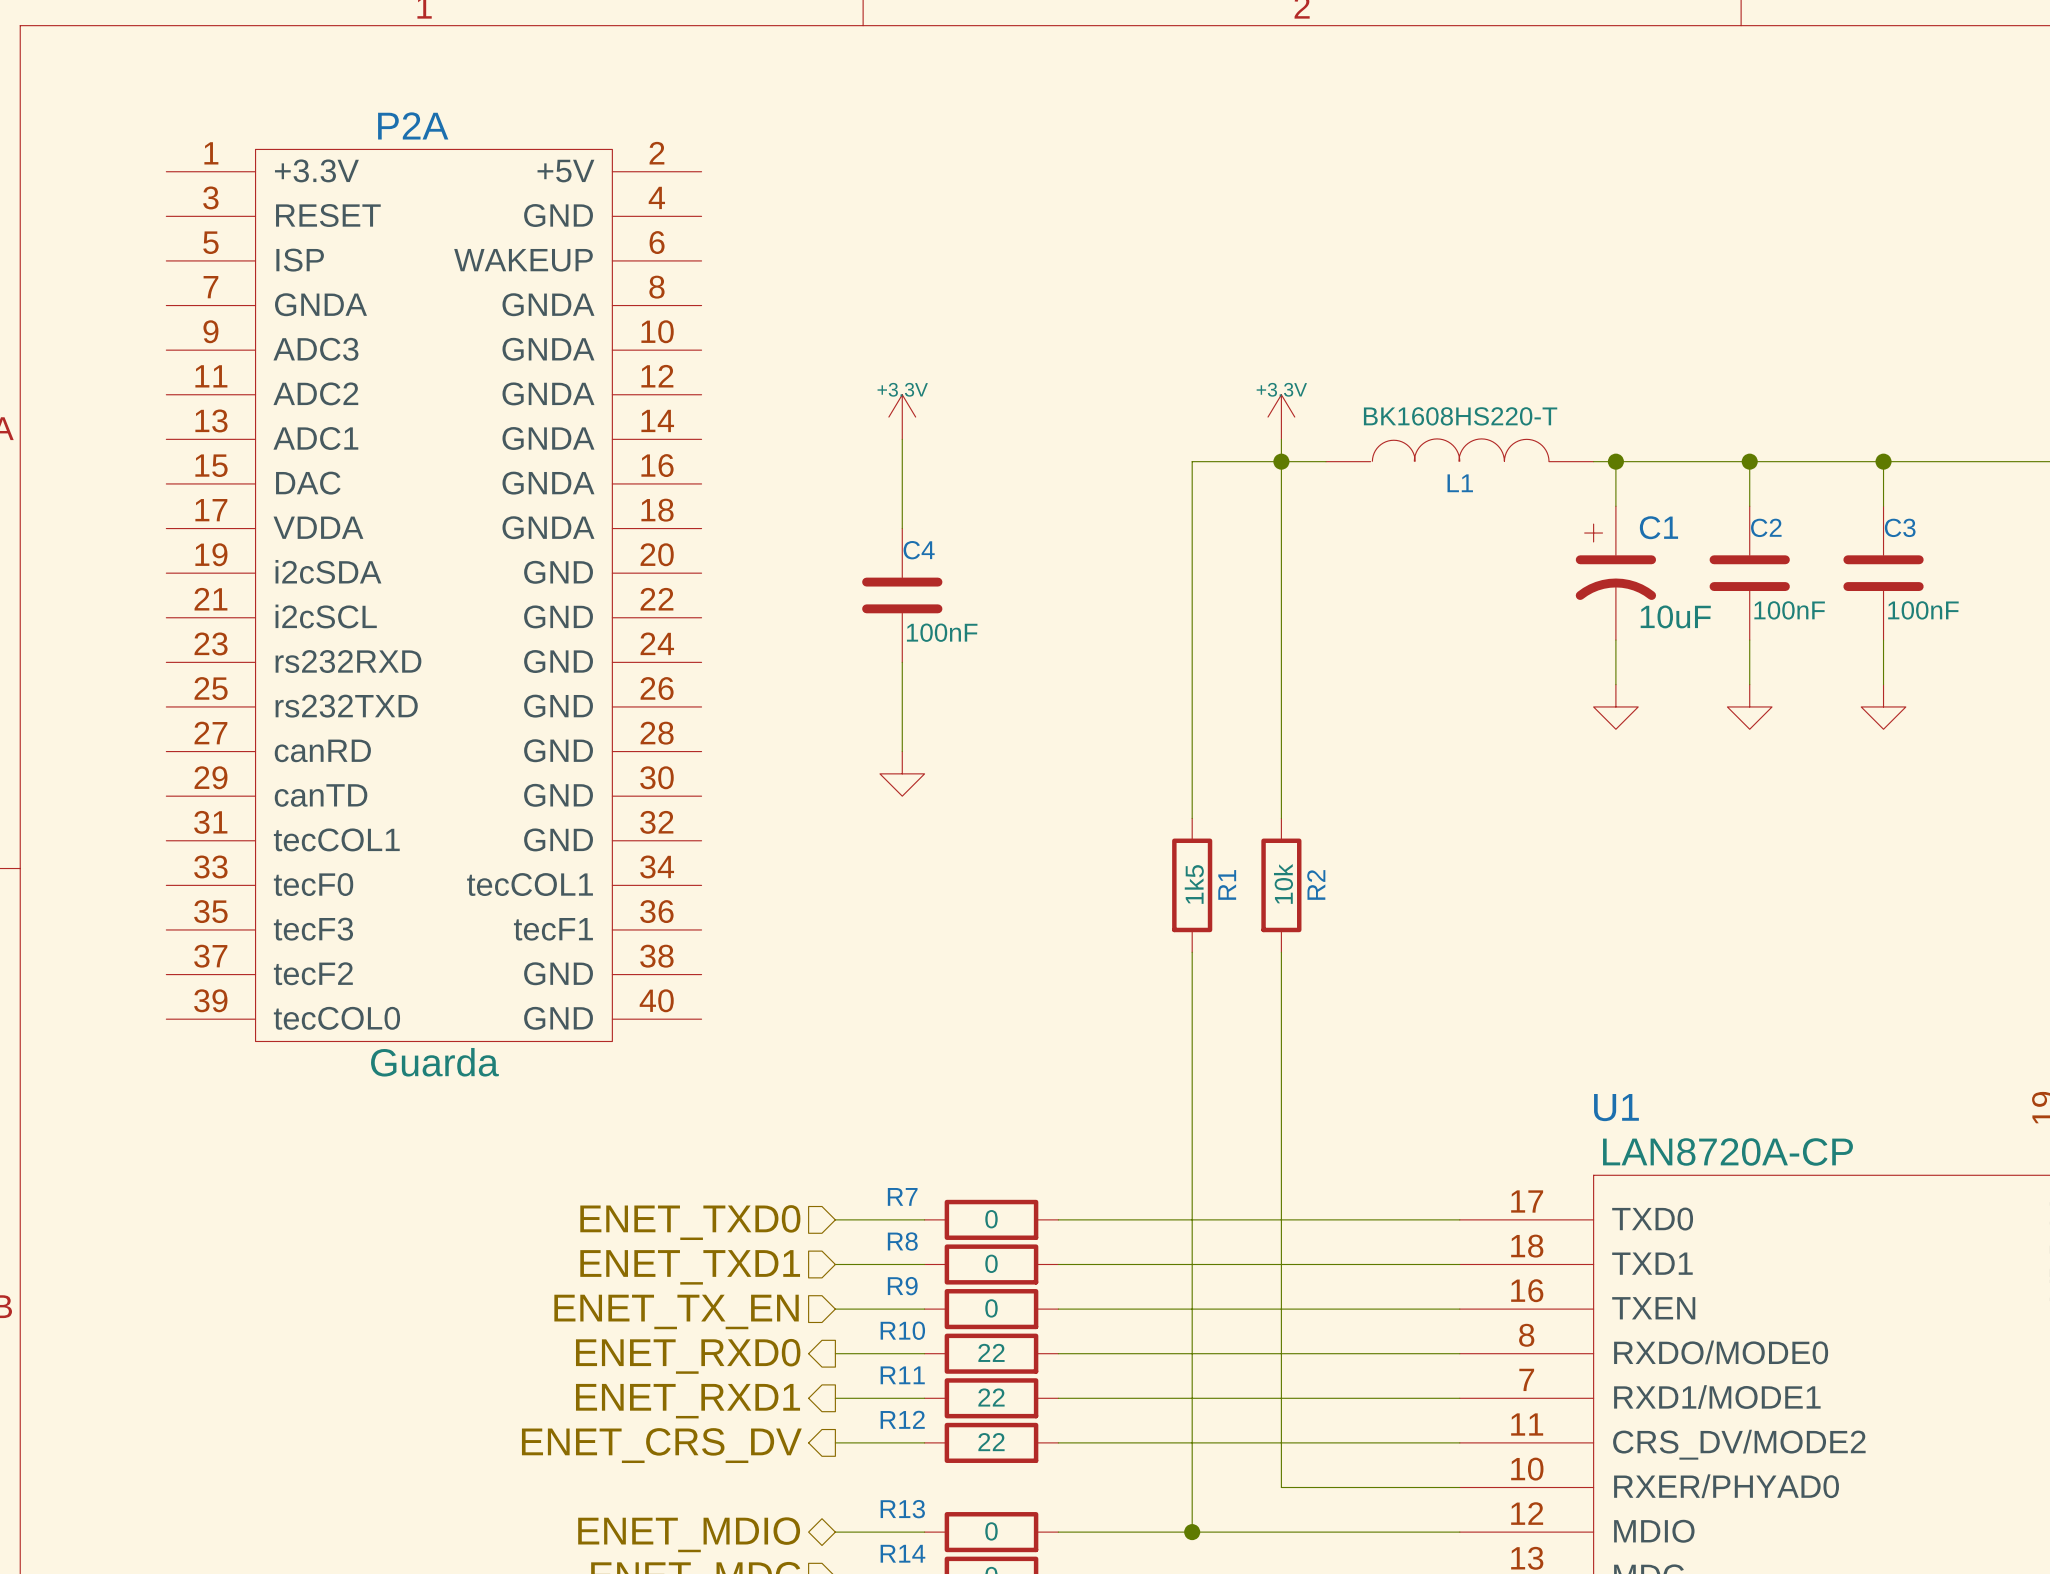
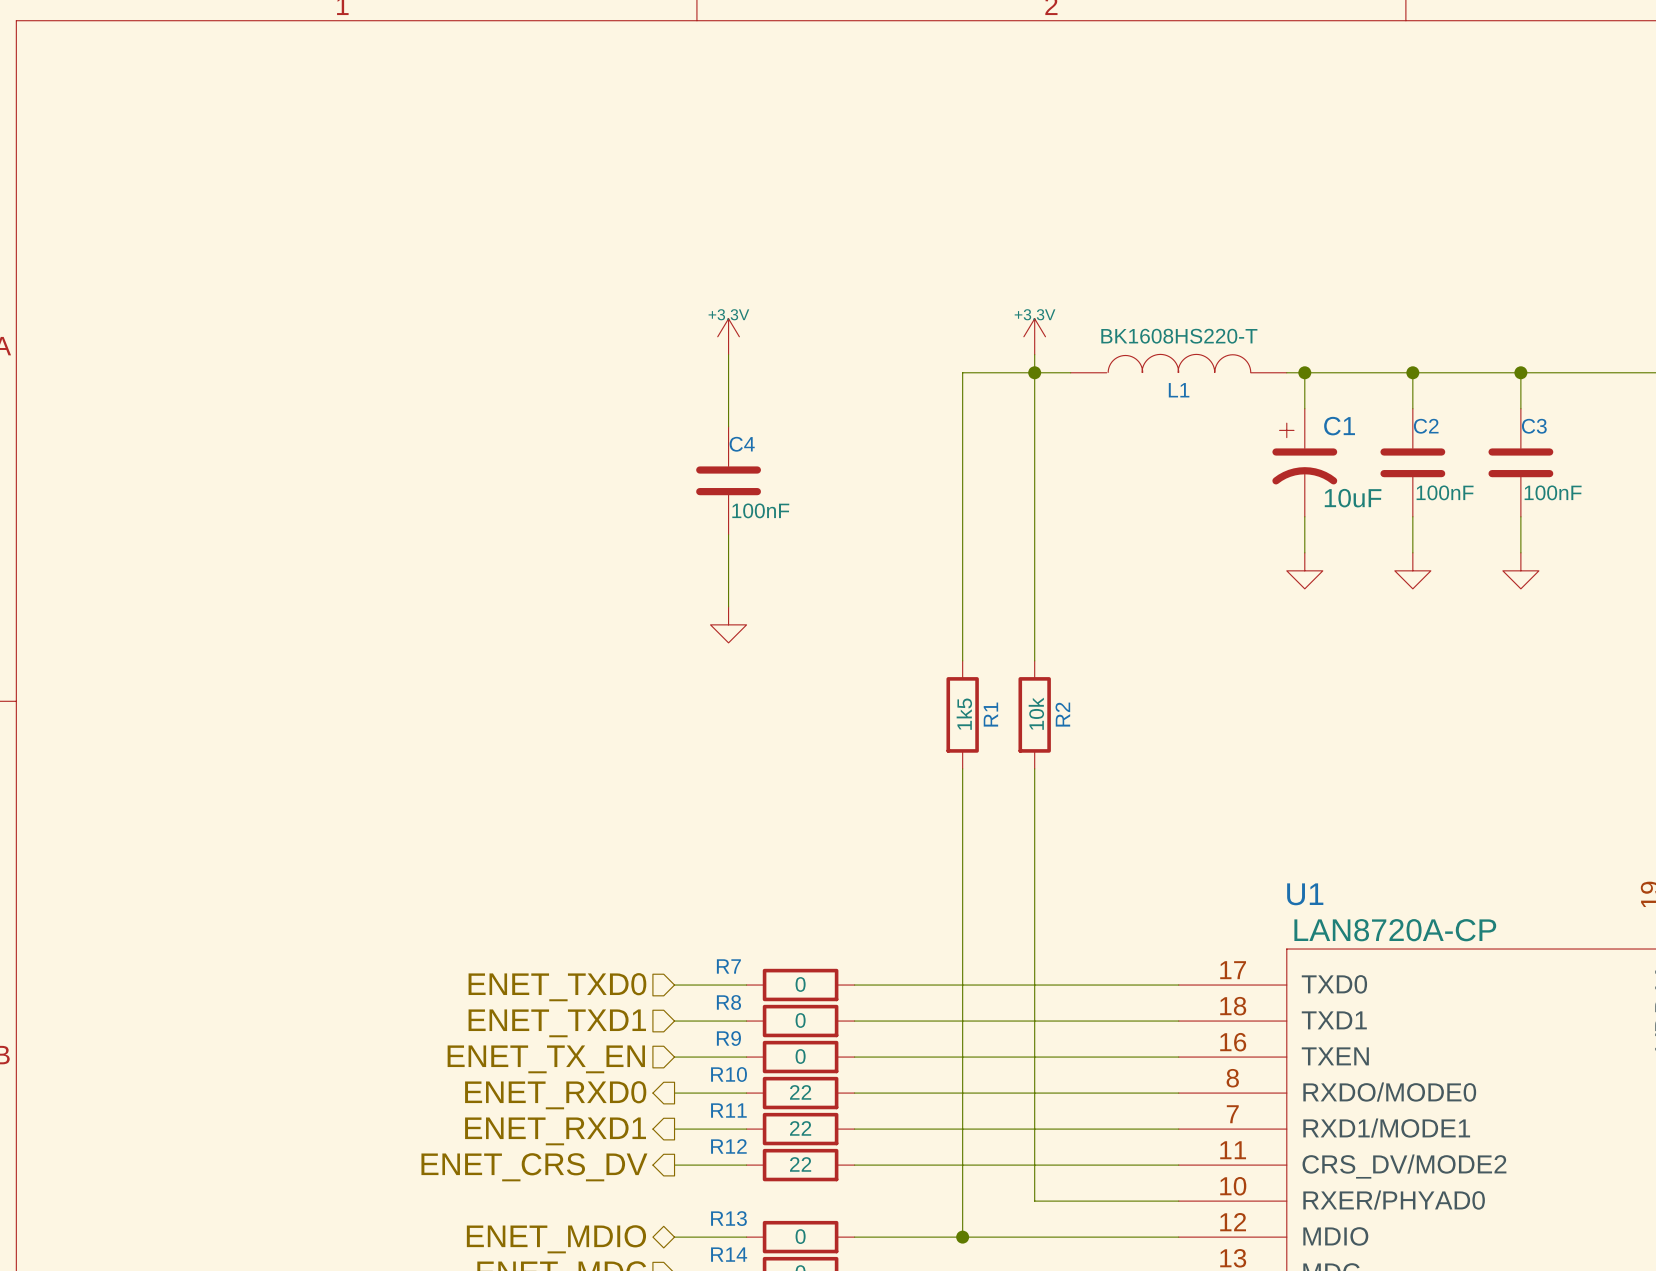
P2A: Guarda (433, 595) -> none

